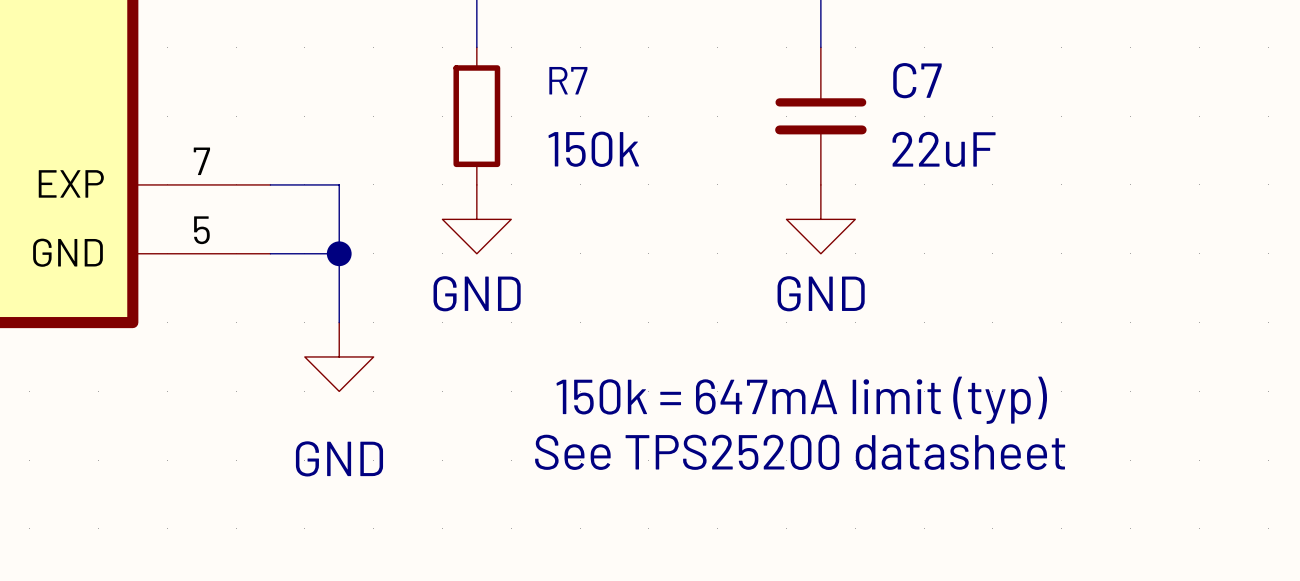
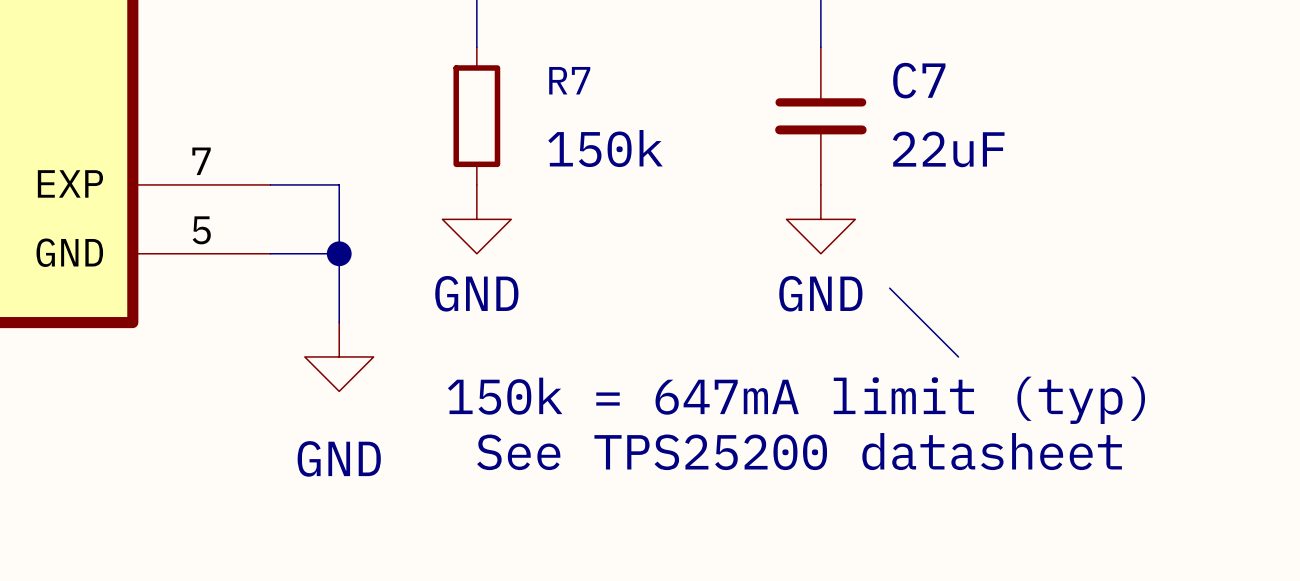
wire: none -> (889, 288) (958, 356)

